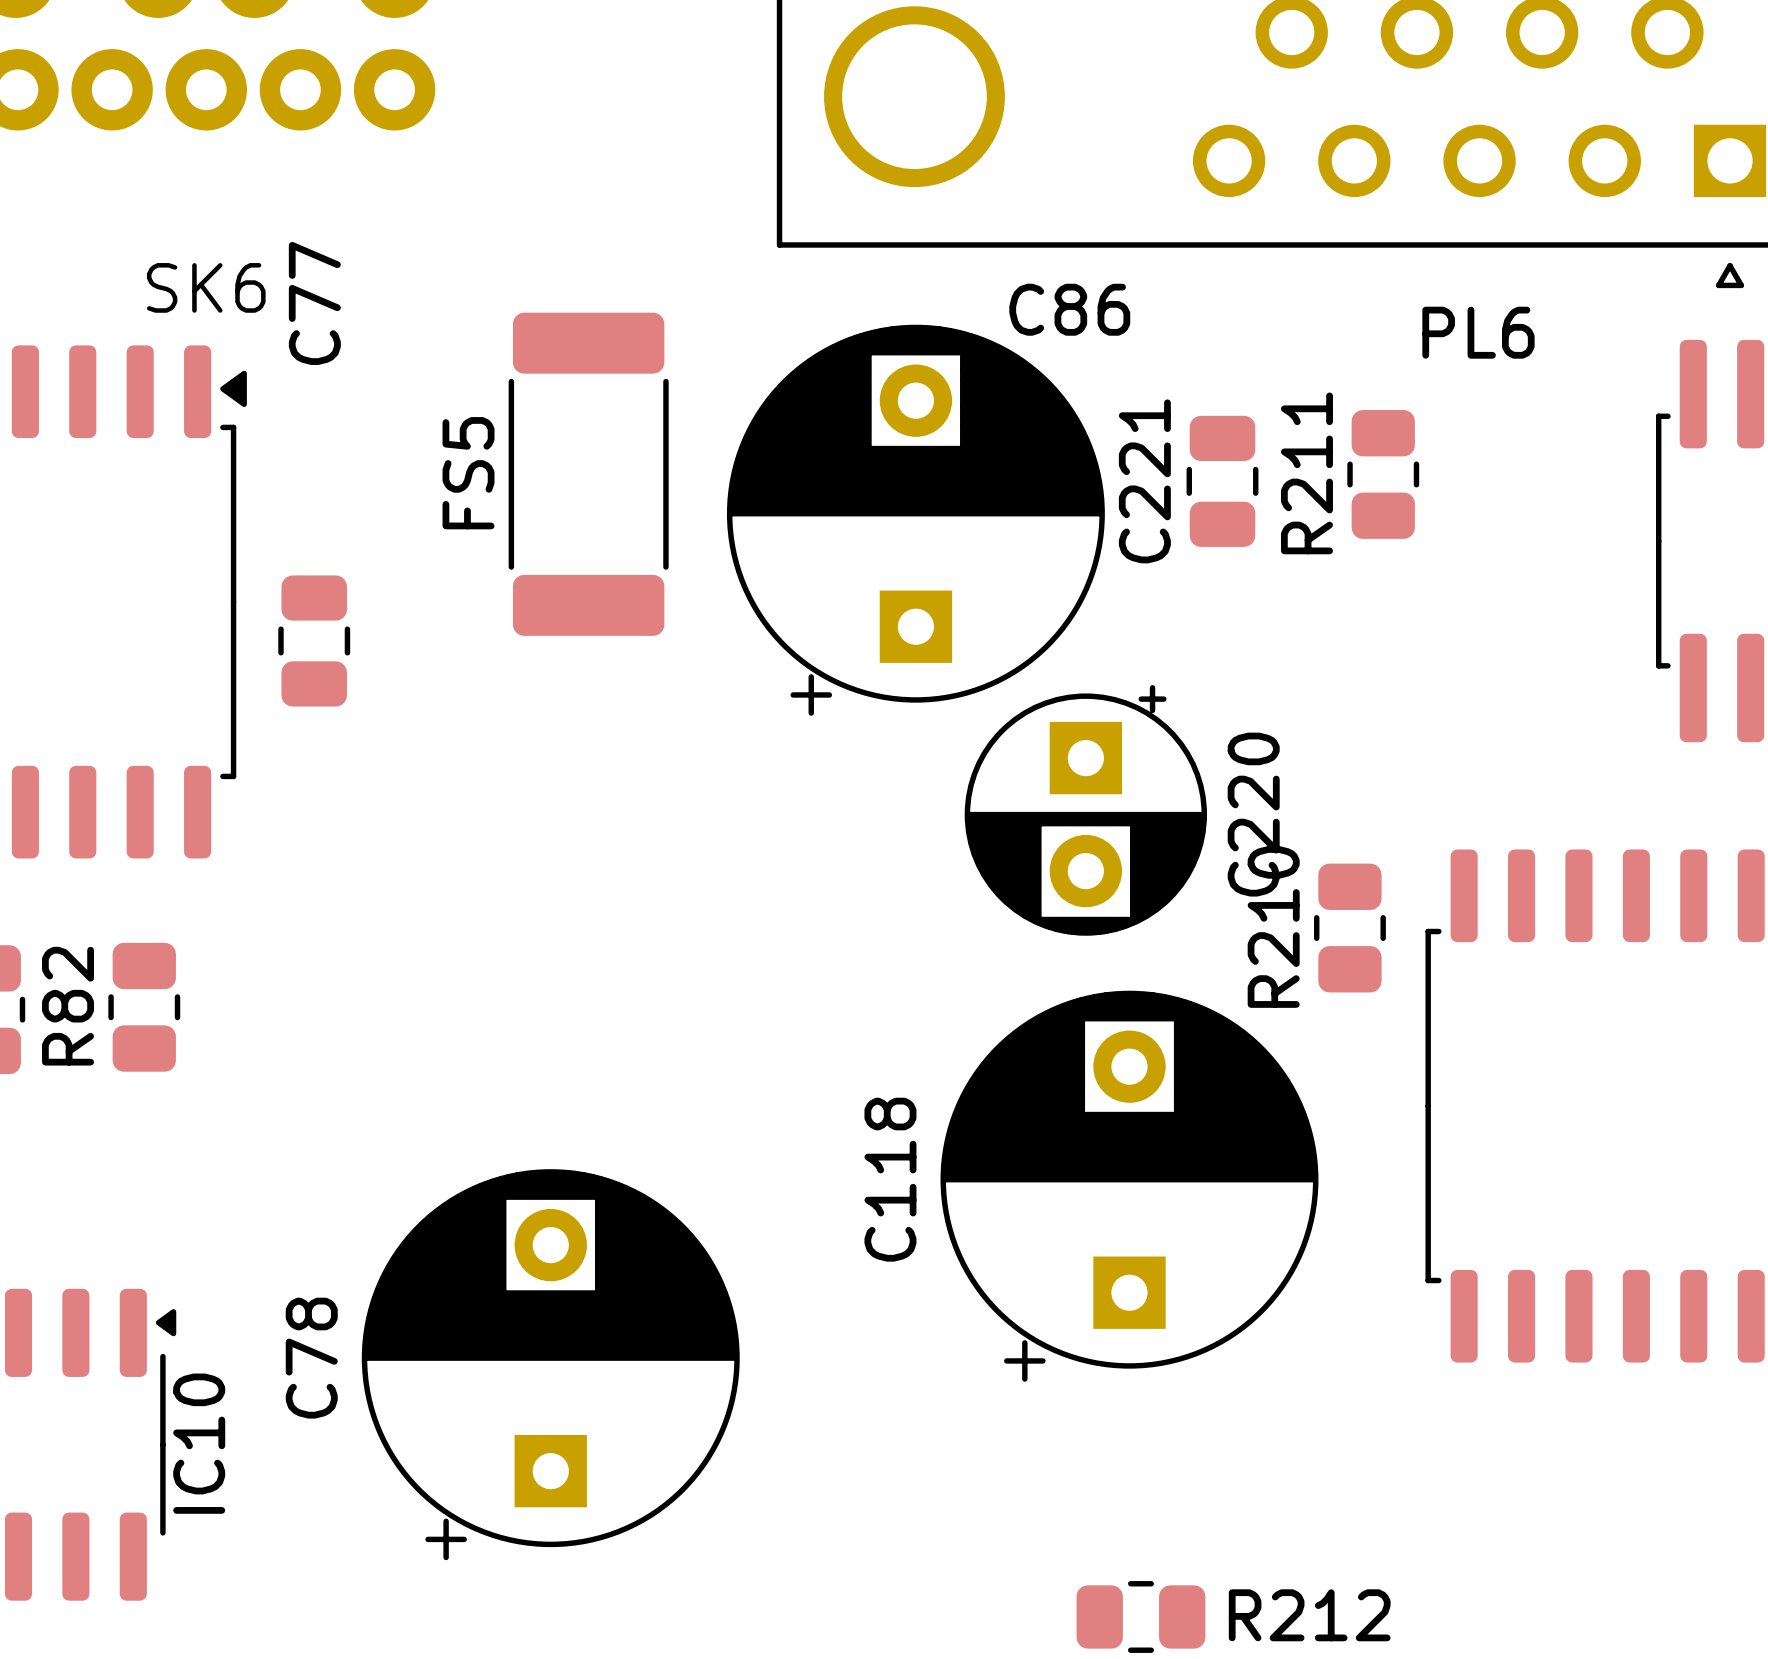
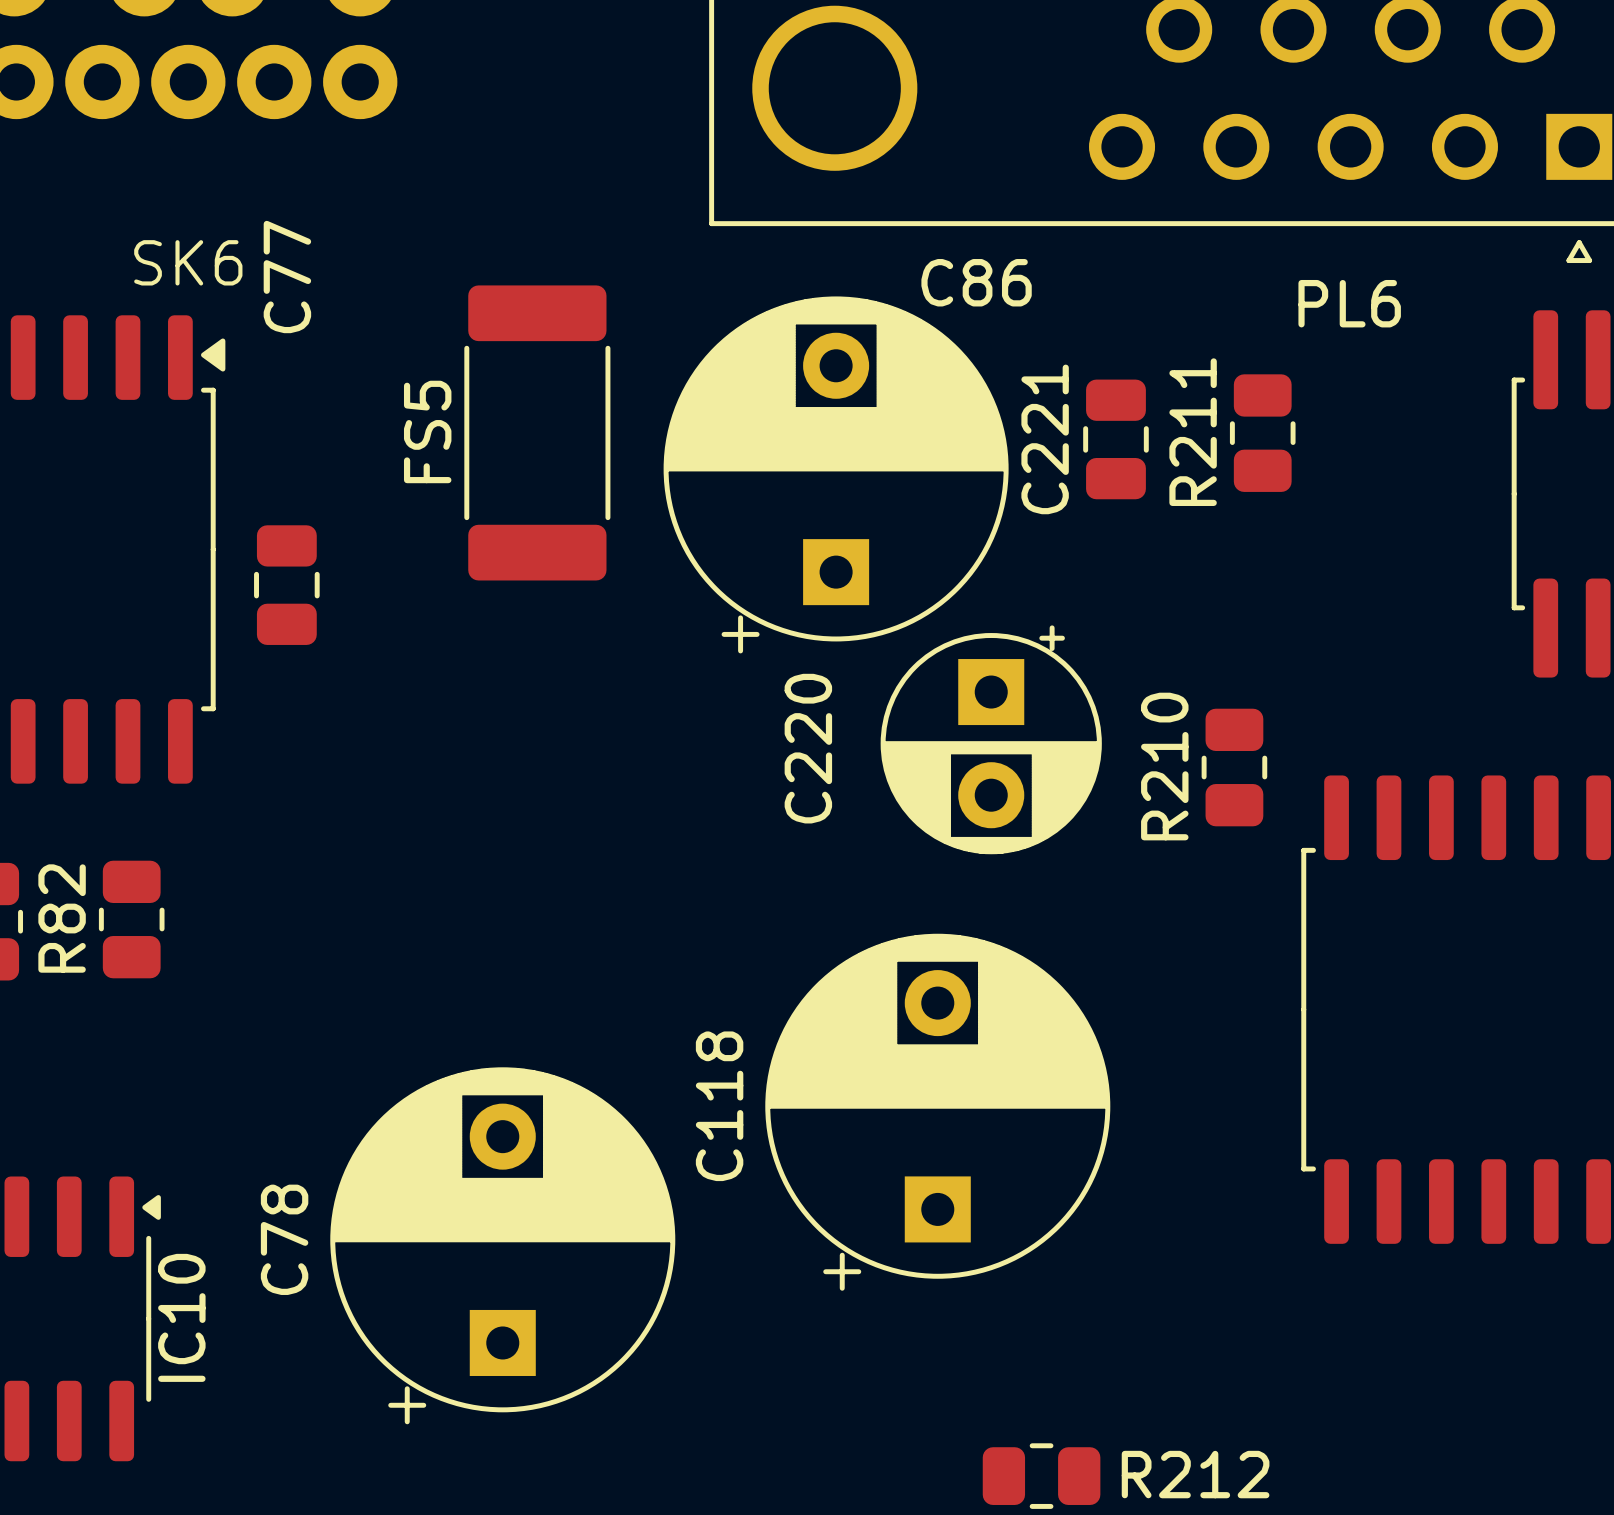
C220 name position: C220 (1253, 814) -> C220 (808, 748)
R210 position: (1349, 928) -> (1234, 767)
C118 position: (1129, 1186) -> (937, 1112)

